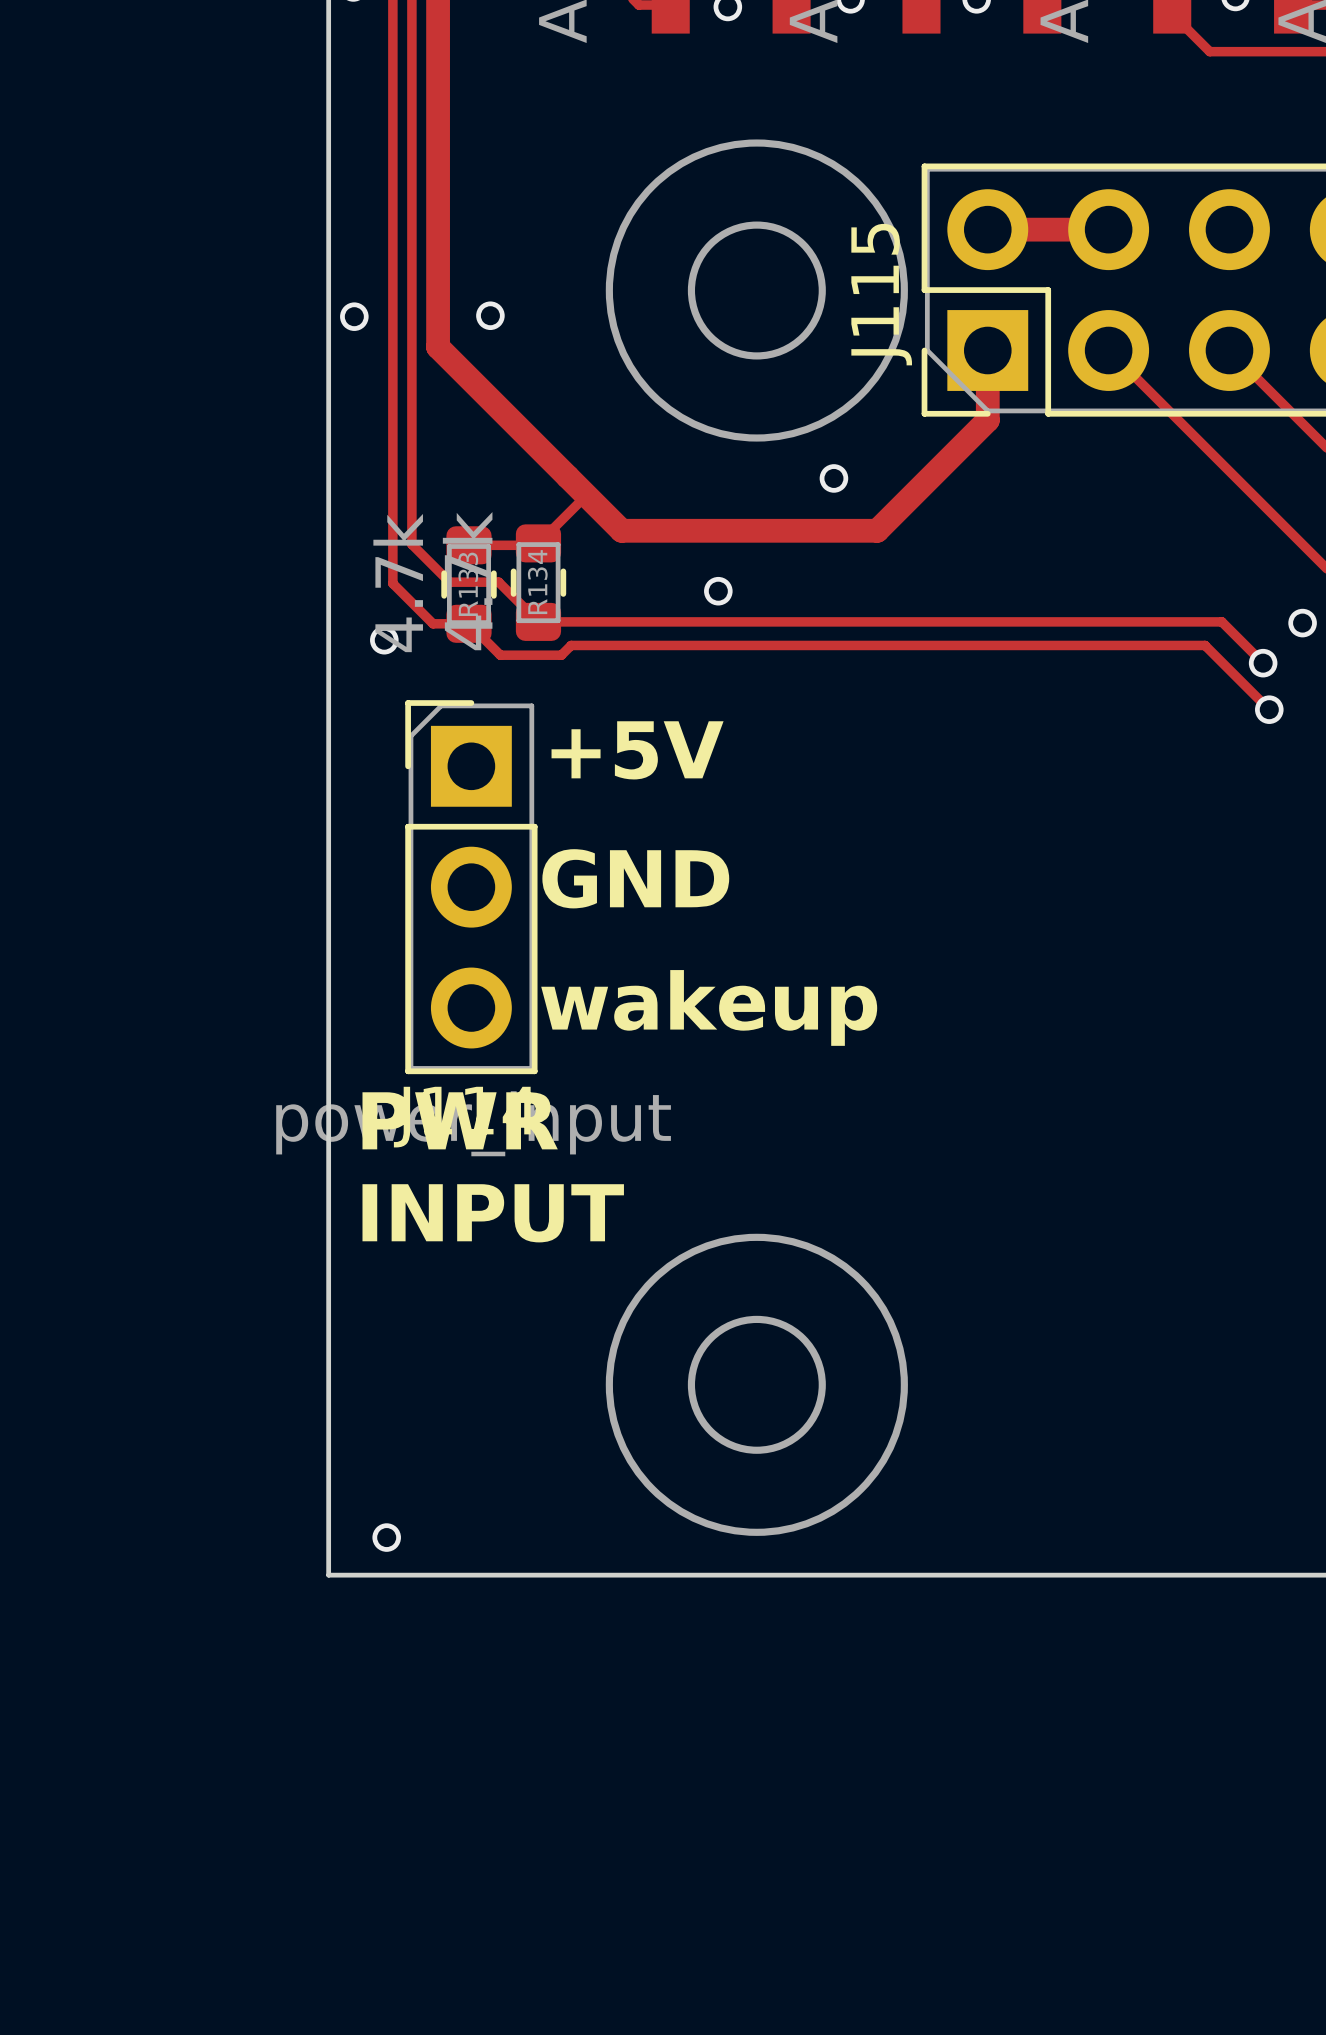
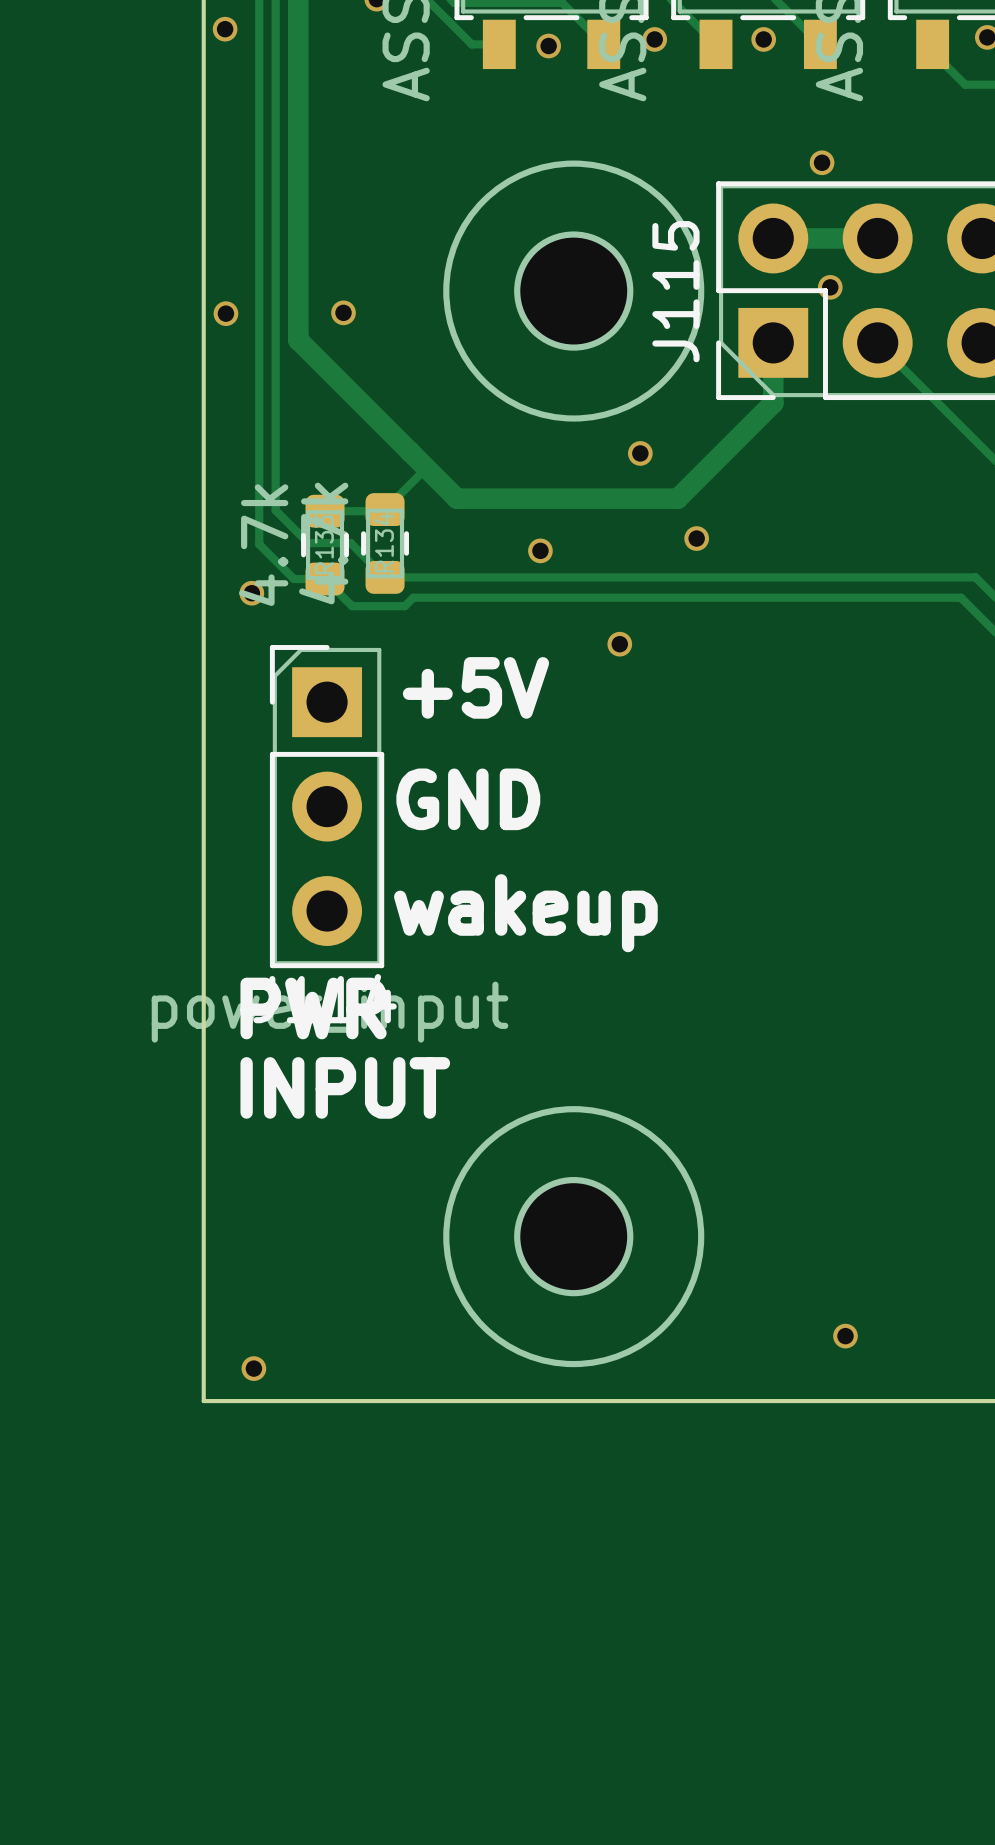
via: none -> (822, 162)
via: none -> (830, 287)
via: none -> (696, 538)
via: none -> (619, 644)
via: none -> (845, 1336)

